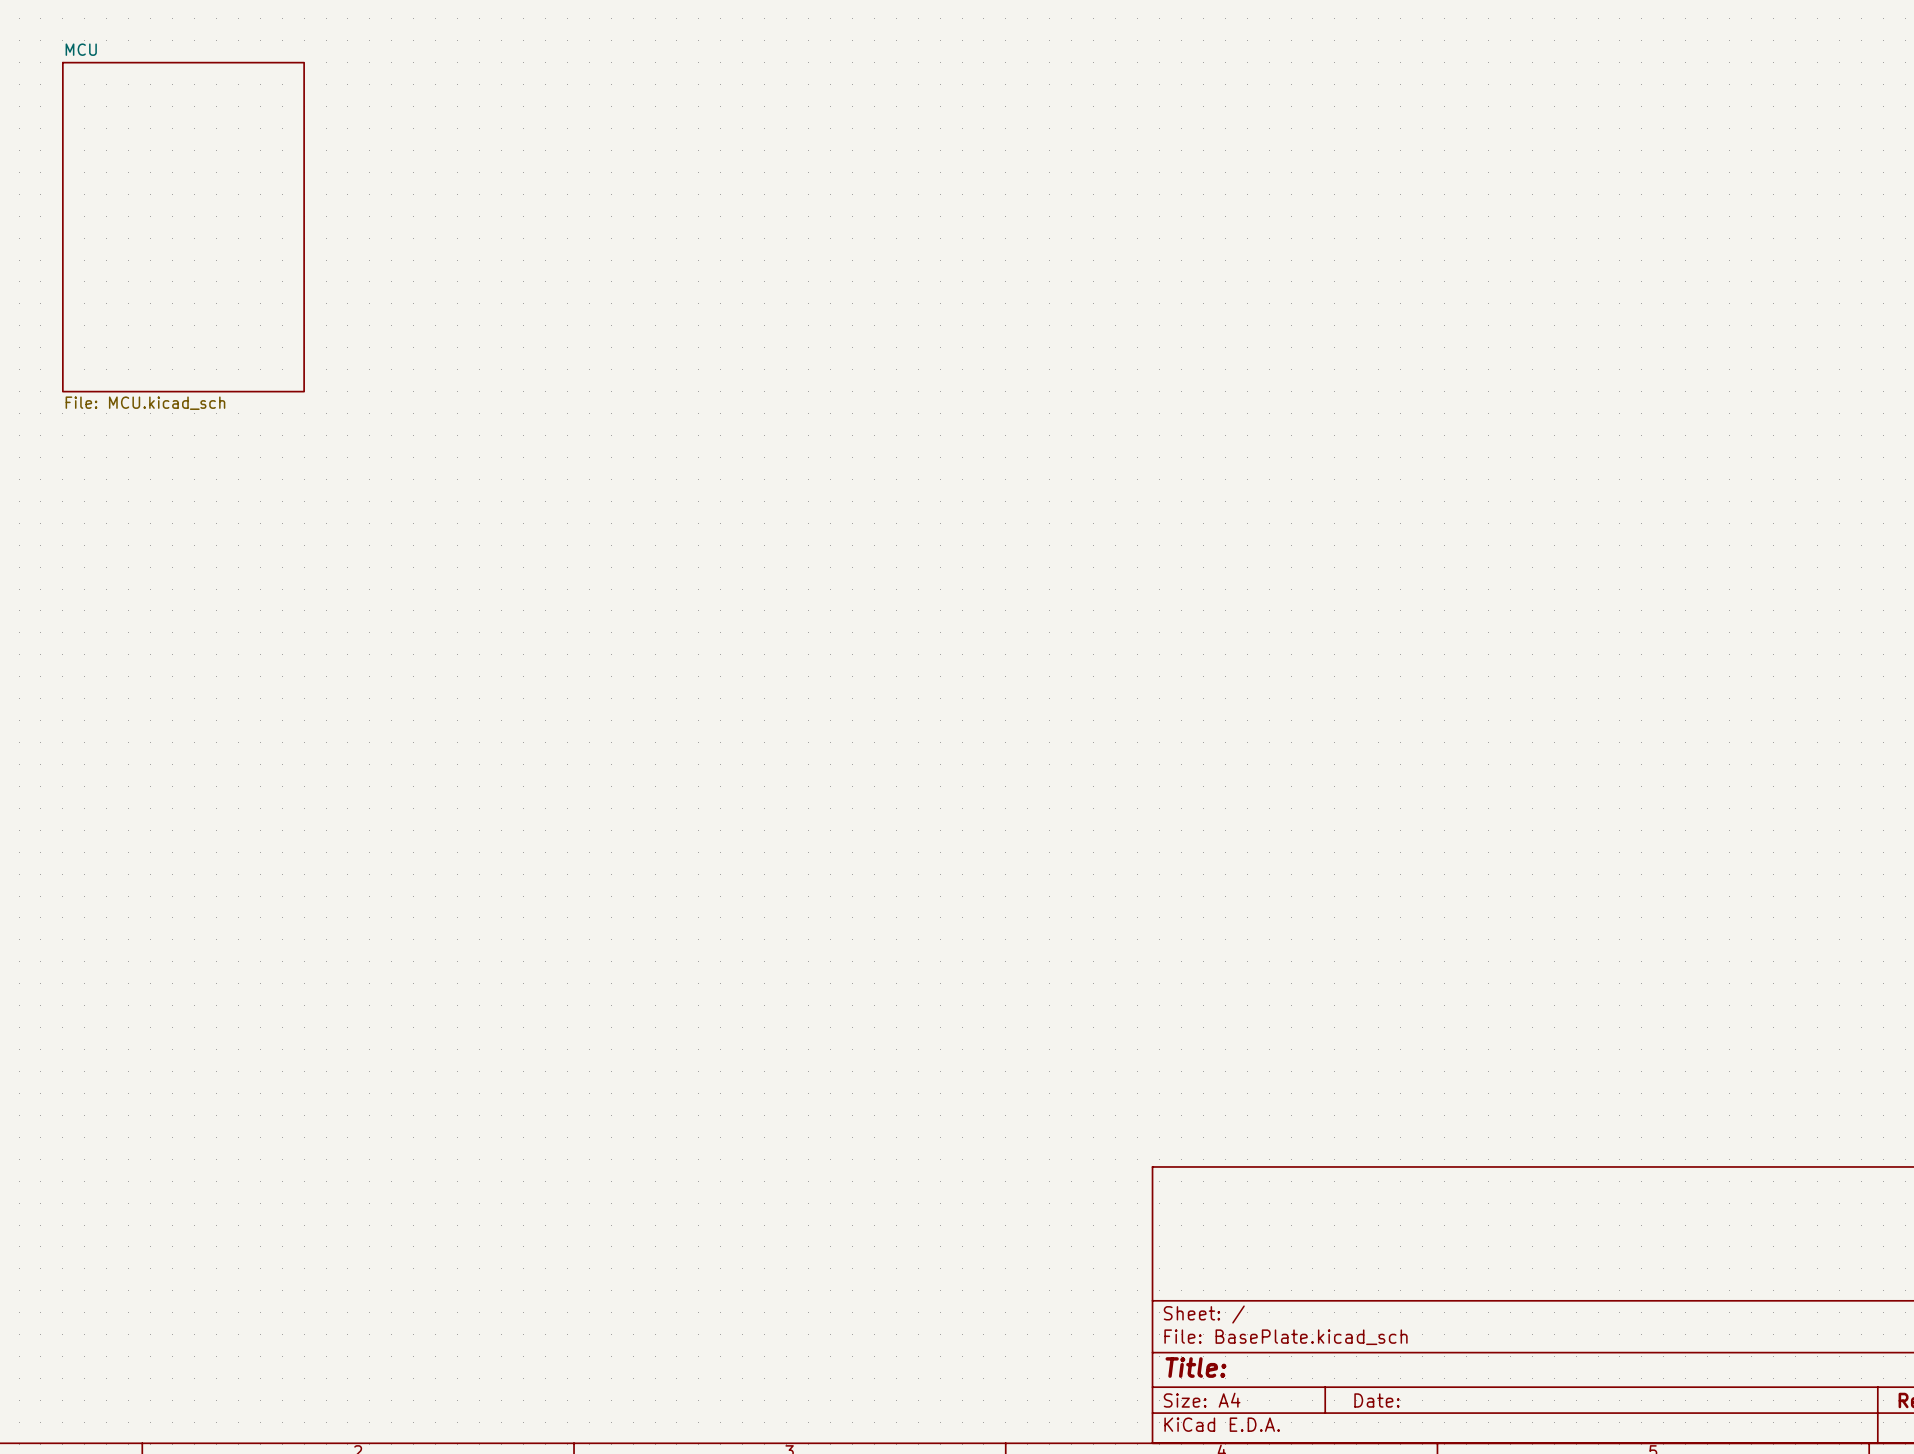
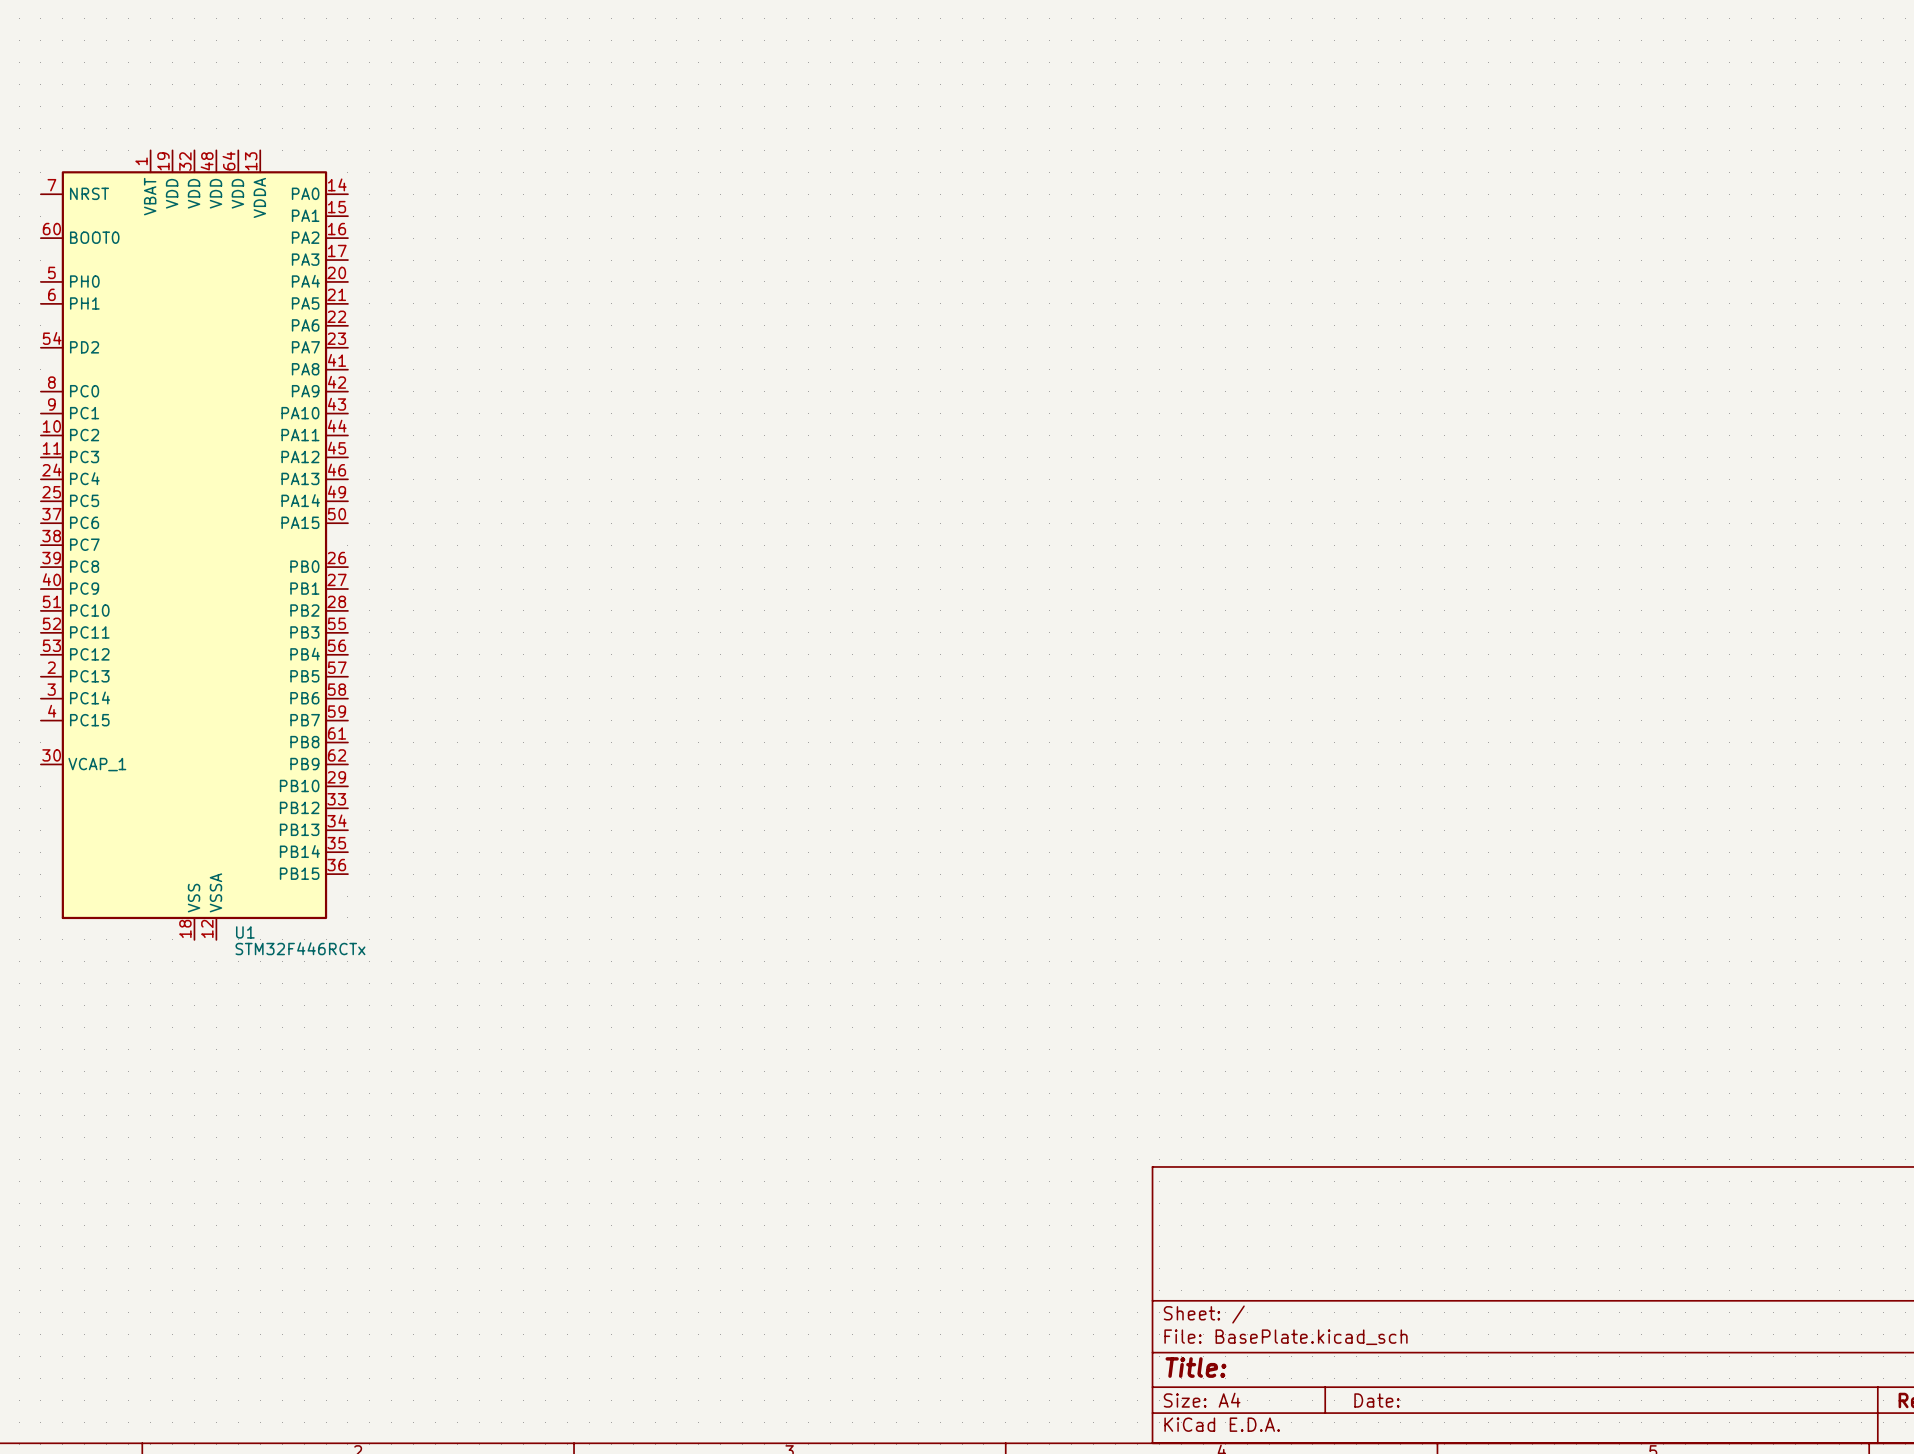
sheet MCU: File: MCU.kicad_sch (183, 227) -> none
U1: none -> STM32F446RCTx (194, 545)

